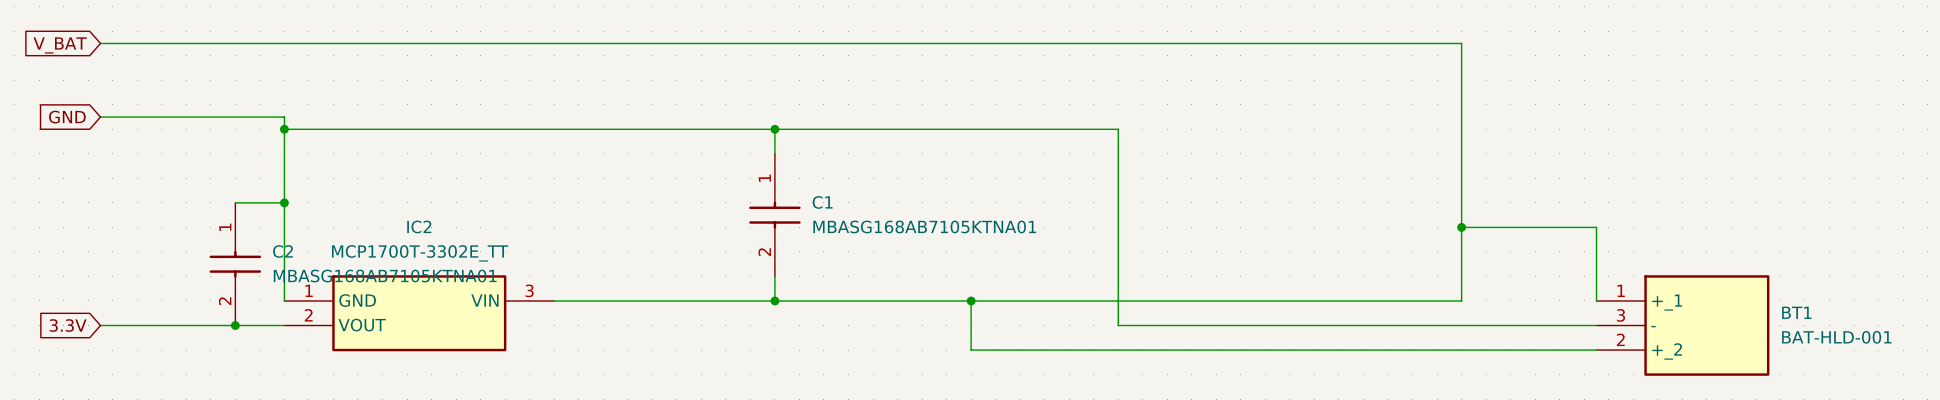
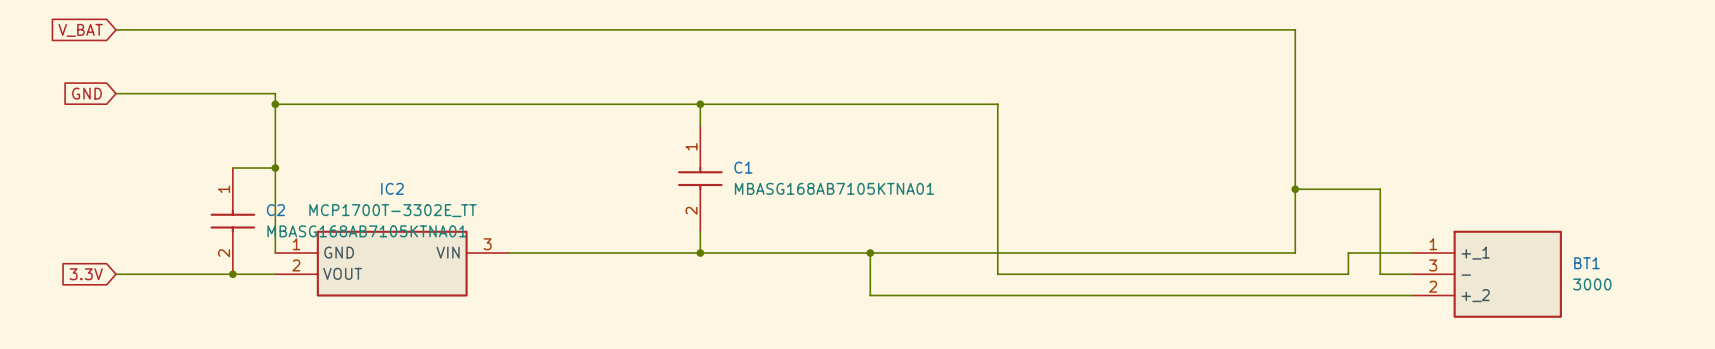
wire: (1559, 227) (1596, 227) (1596, 300) -> (1380, 189) (1380, 274)
wire: (1522, 325) (1559, 325) -> (1348, 274) (1348, 253) (1412, 253)
BT1 value: BAT-HLD-001 (1836, 337) -> 3000 (1592, 284)

